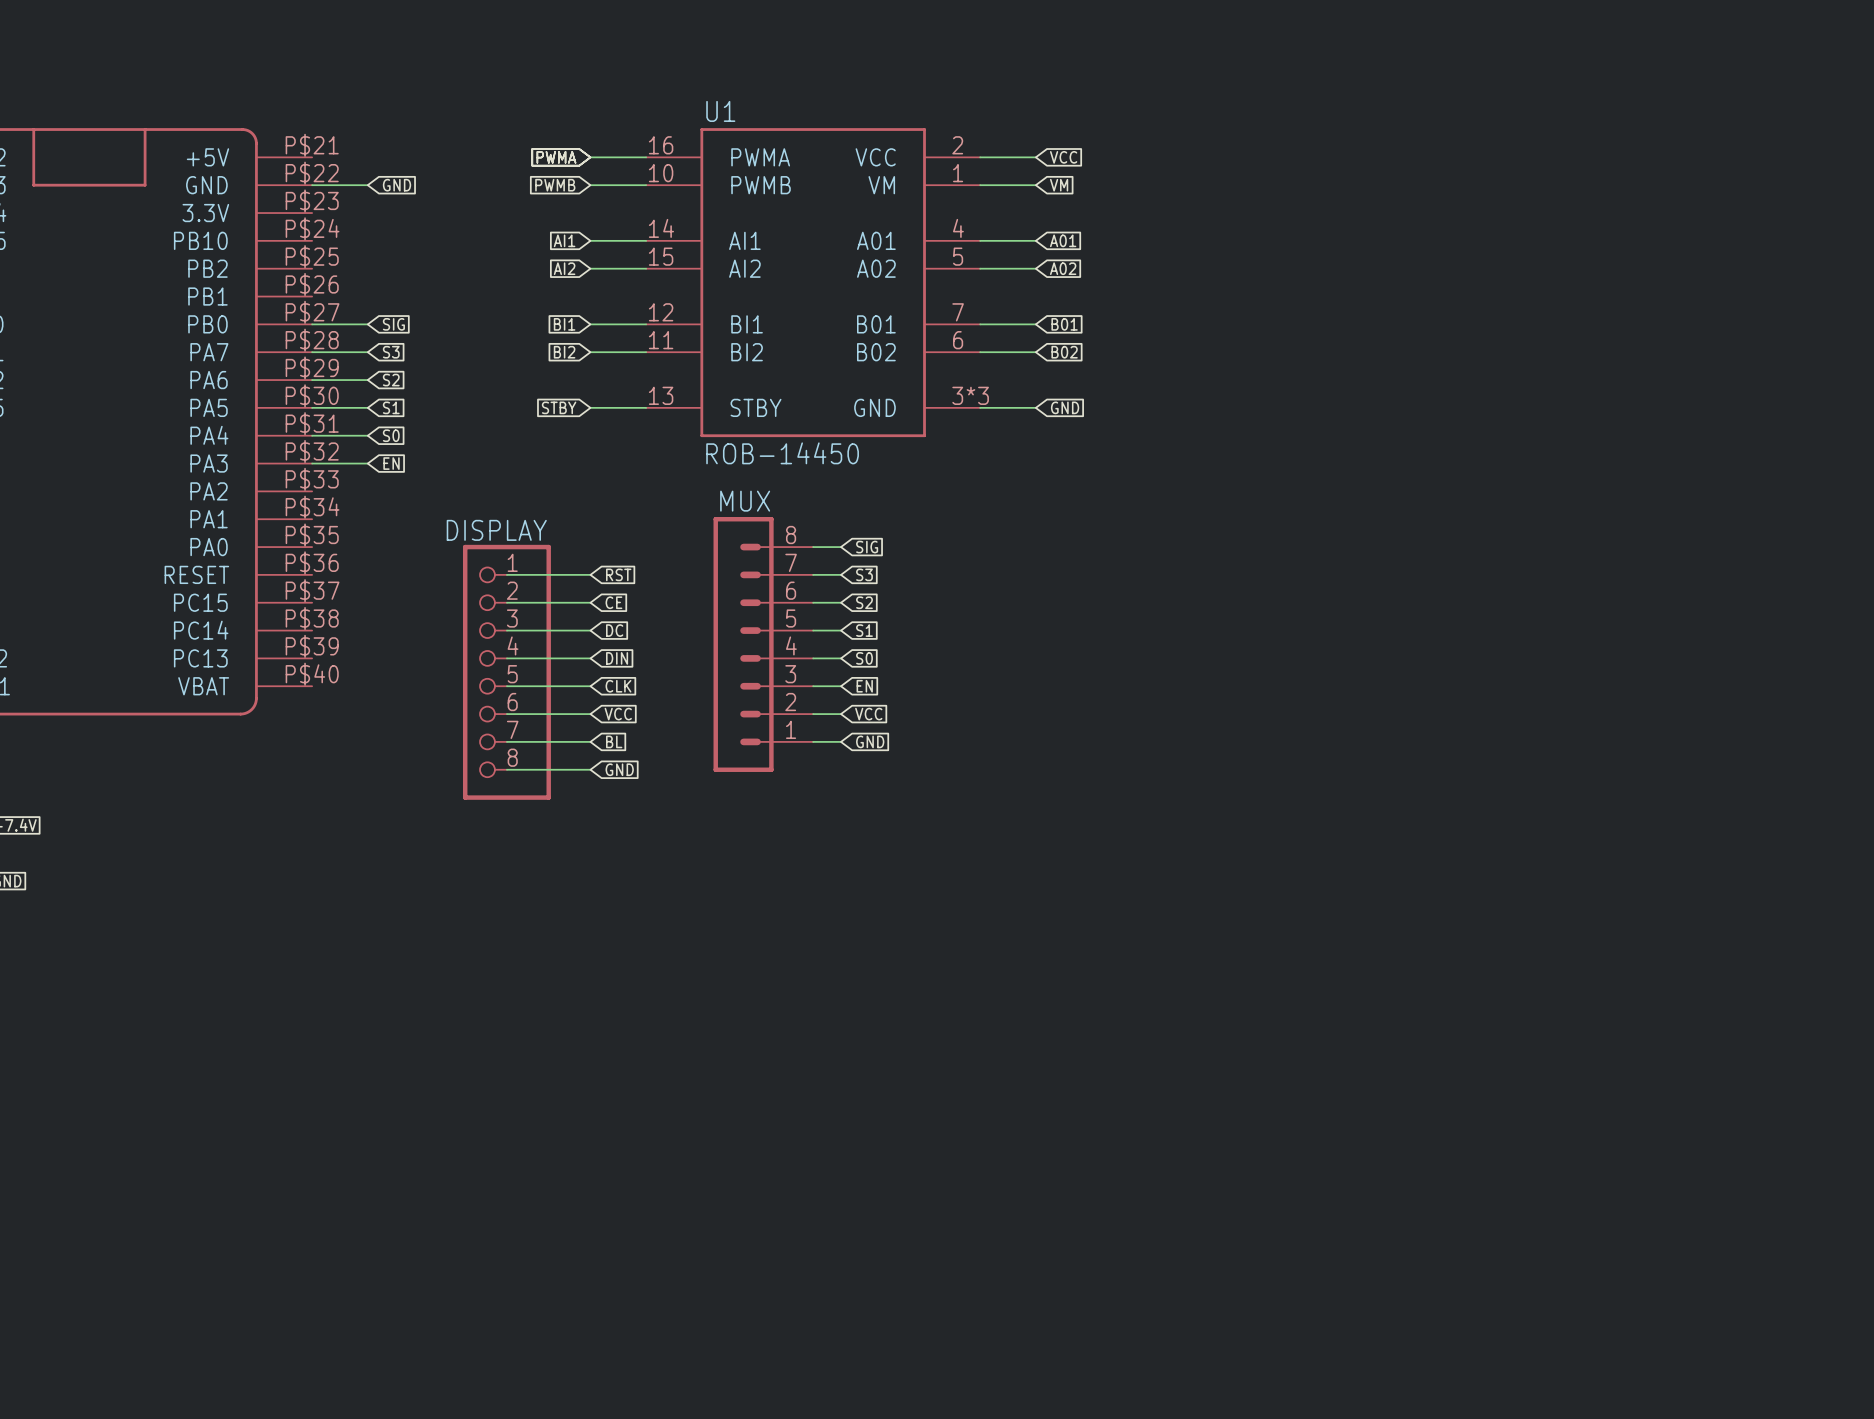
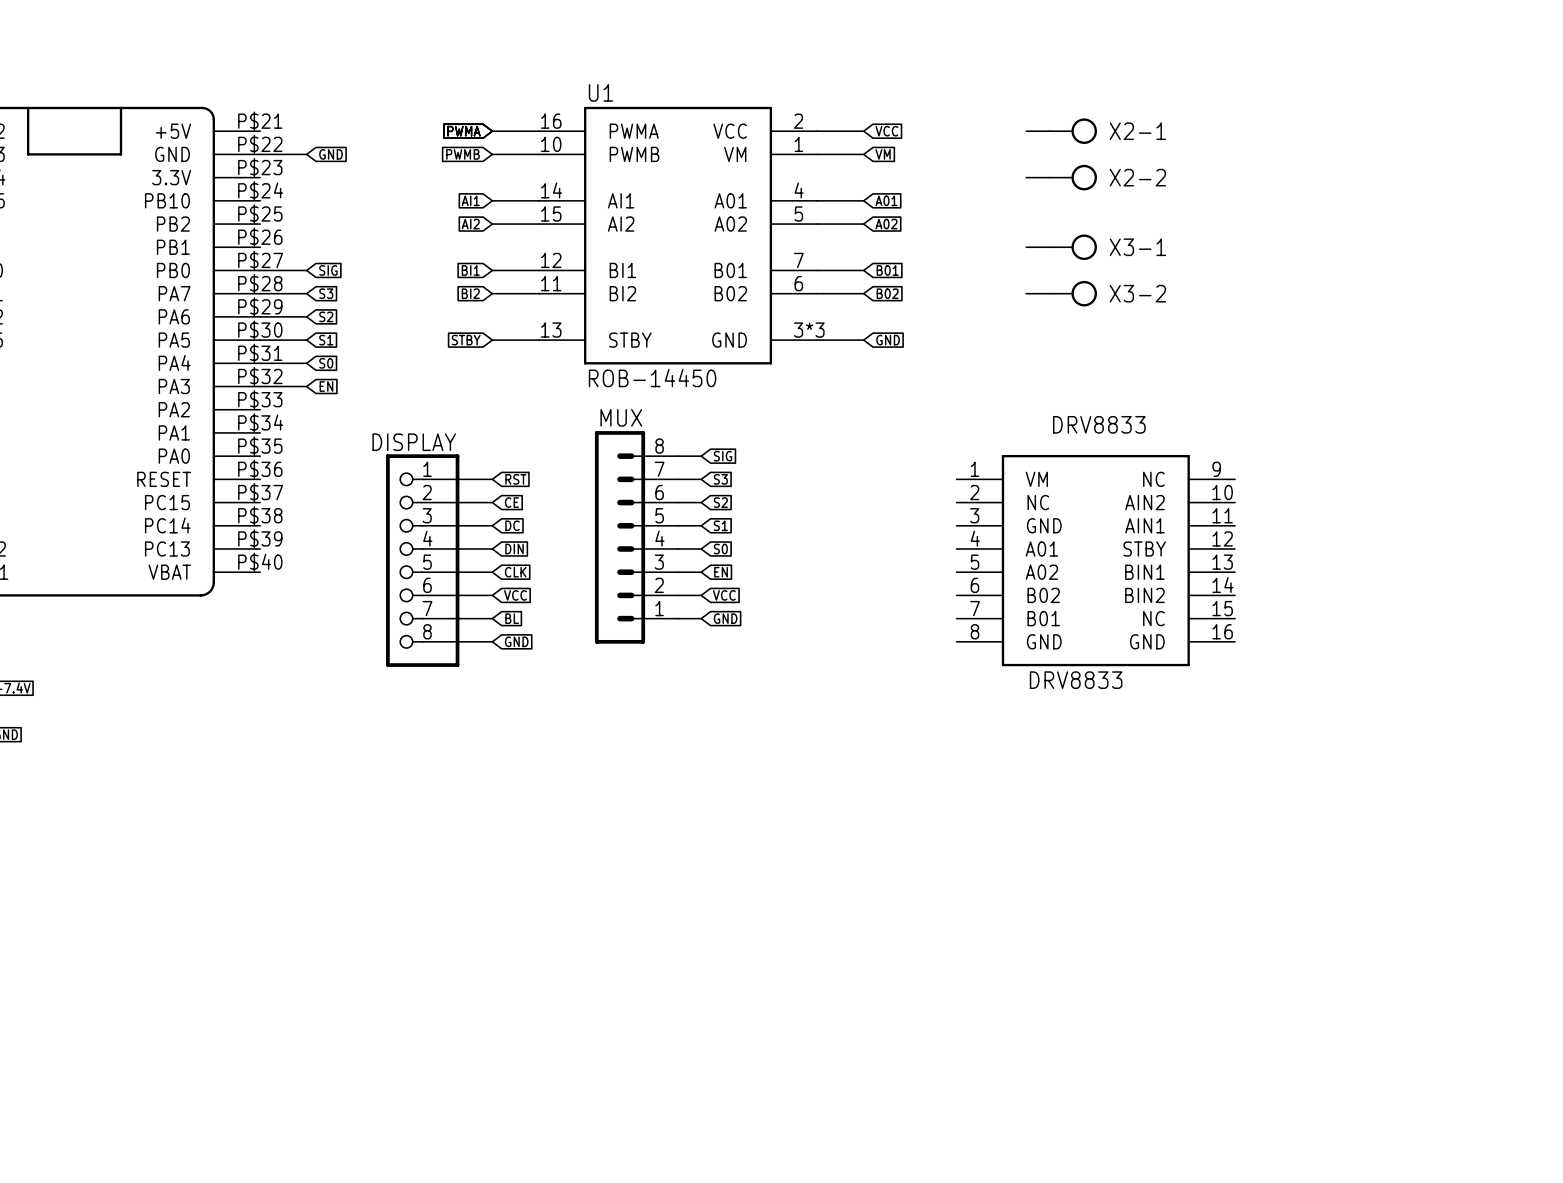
wire: none -> (1026, 131) (1049, 131)
X2-1: none -> (1073, 131)
wire: none -> (1026, 177) (1049, 177)
X2-2: none -> (1073, 177)
wire: none -> (1026, 247) (1049, 247)
X3-1: none -> (1073, 247)
wire: none -> (1026, 293) (1049, 293)
X3-2: none -> (1073, 293)
part: none -> DRV8833 (1095, 560)

